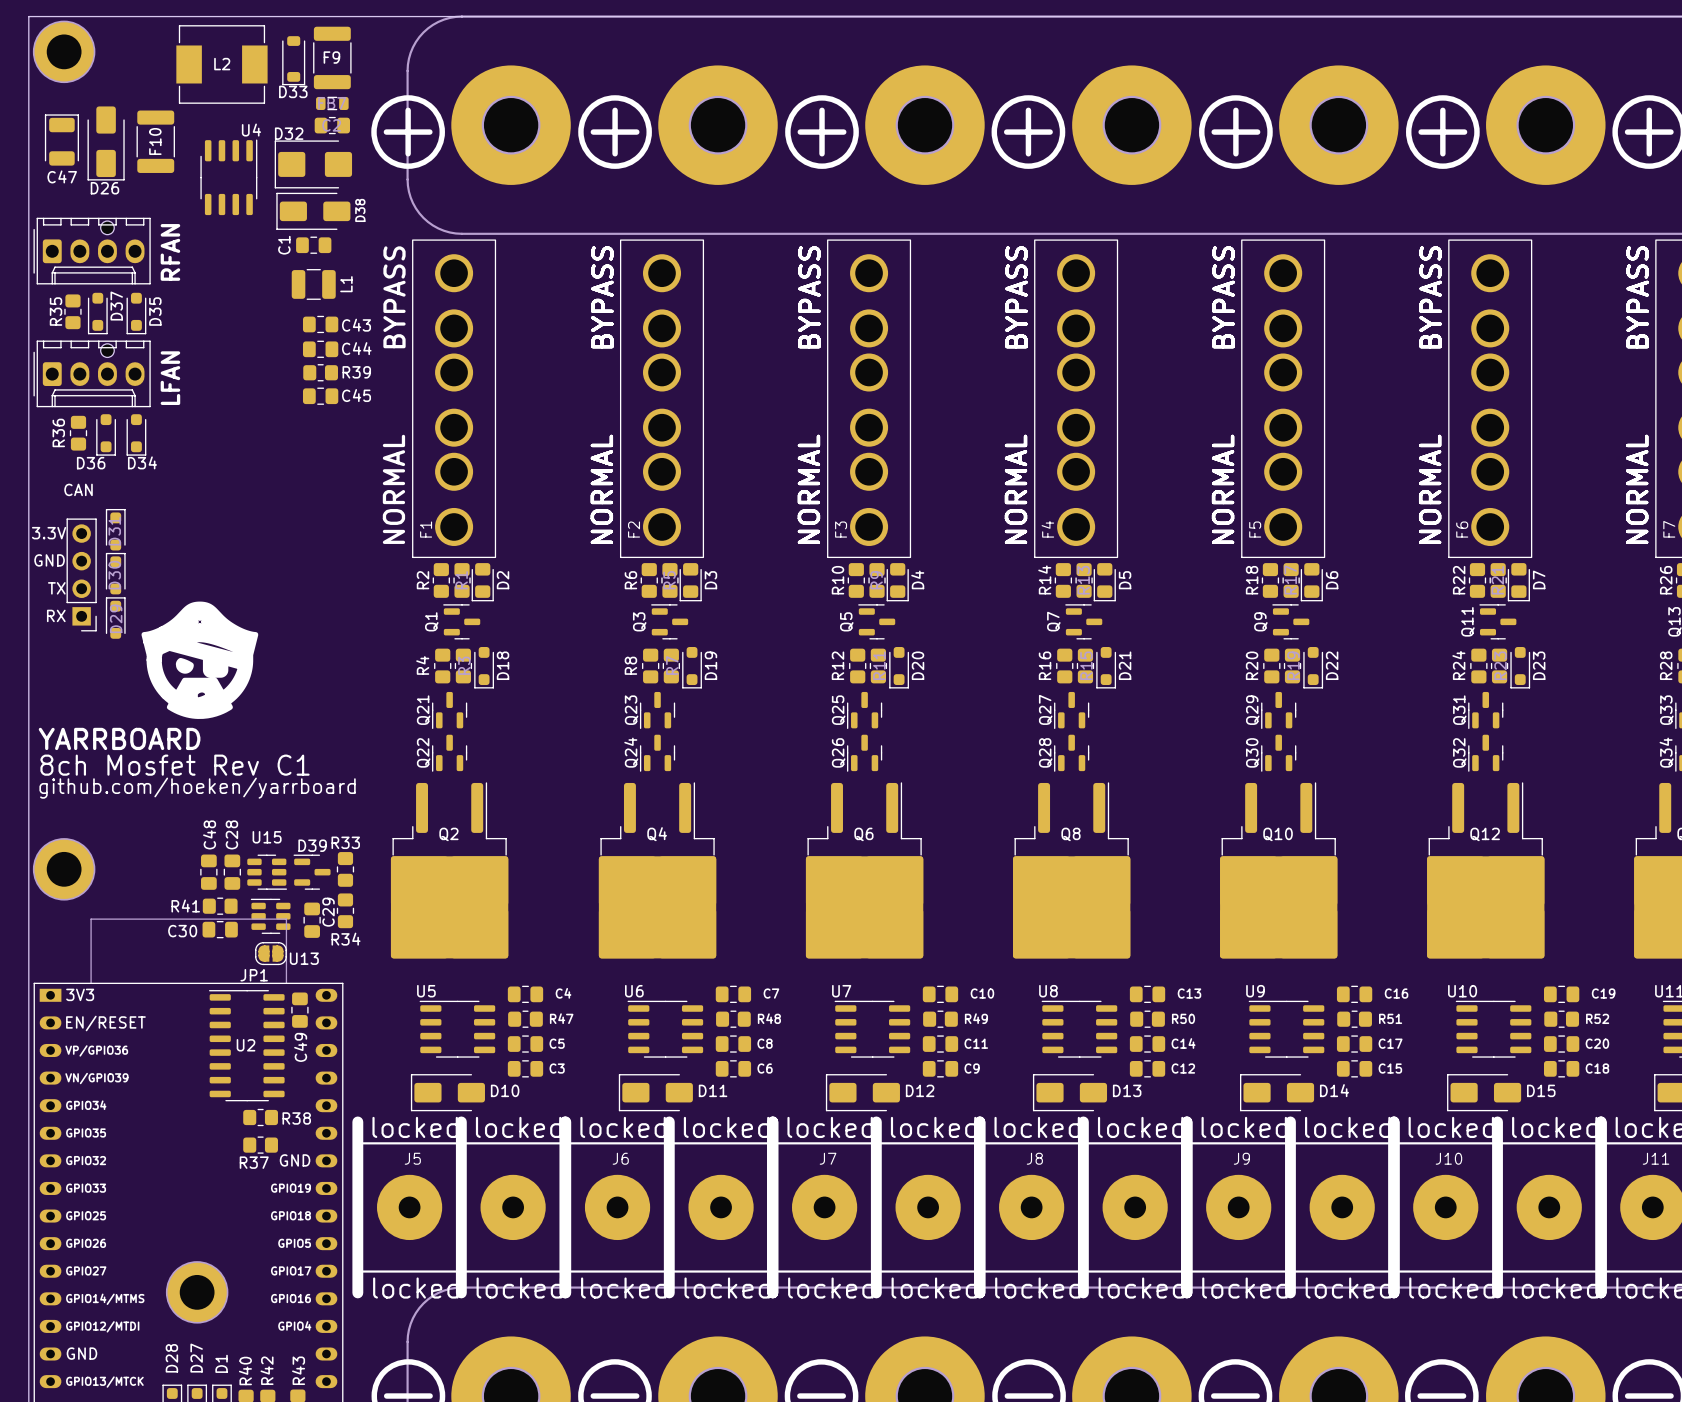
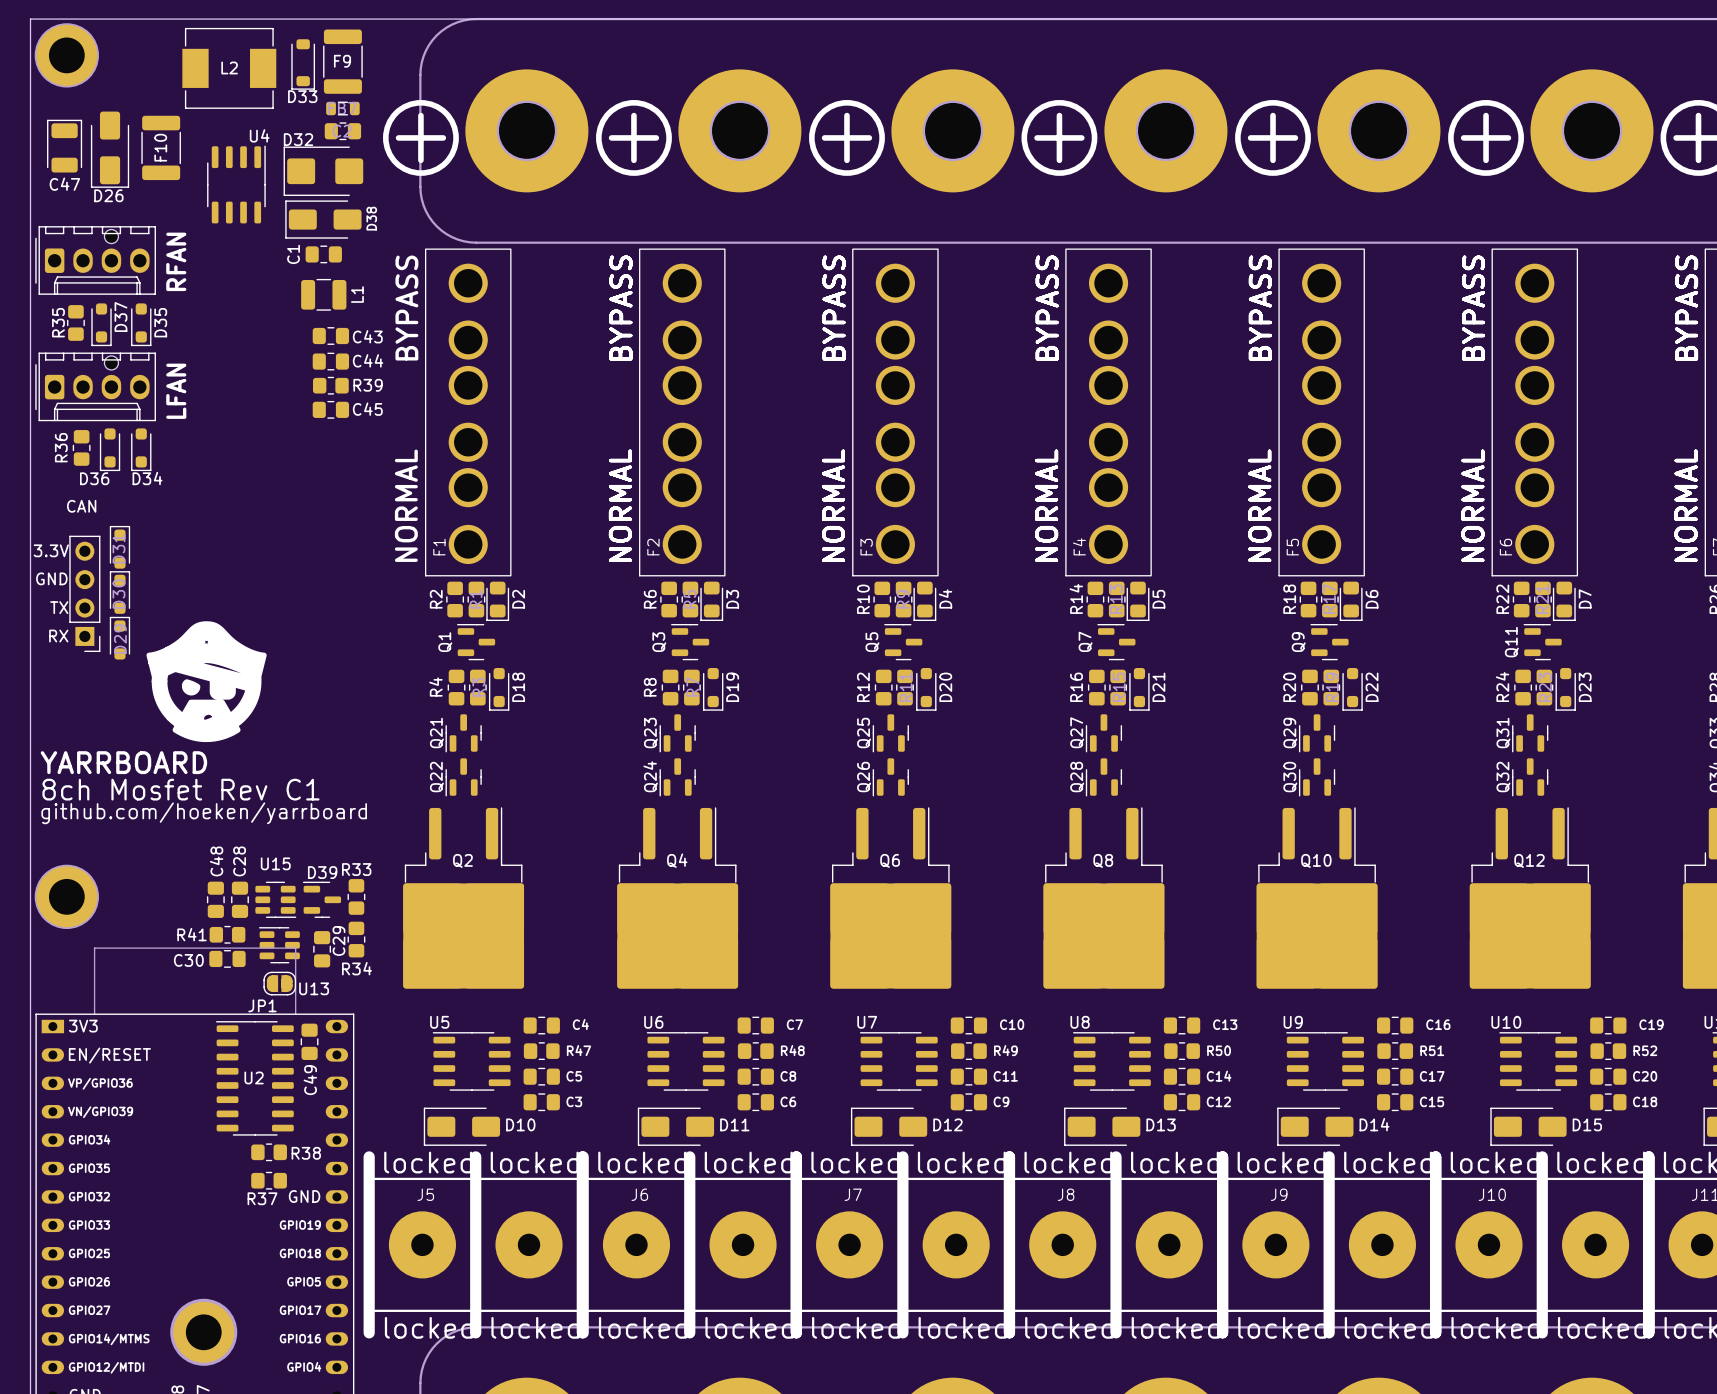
drawing: none -> [170, 1298, 238, 1366]

